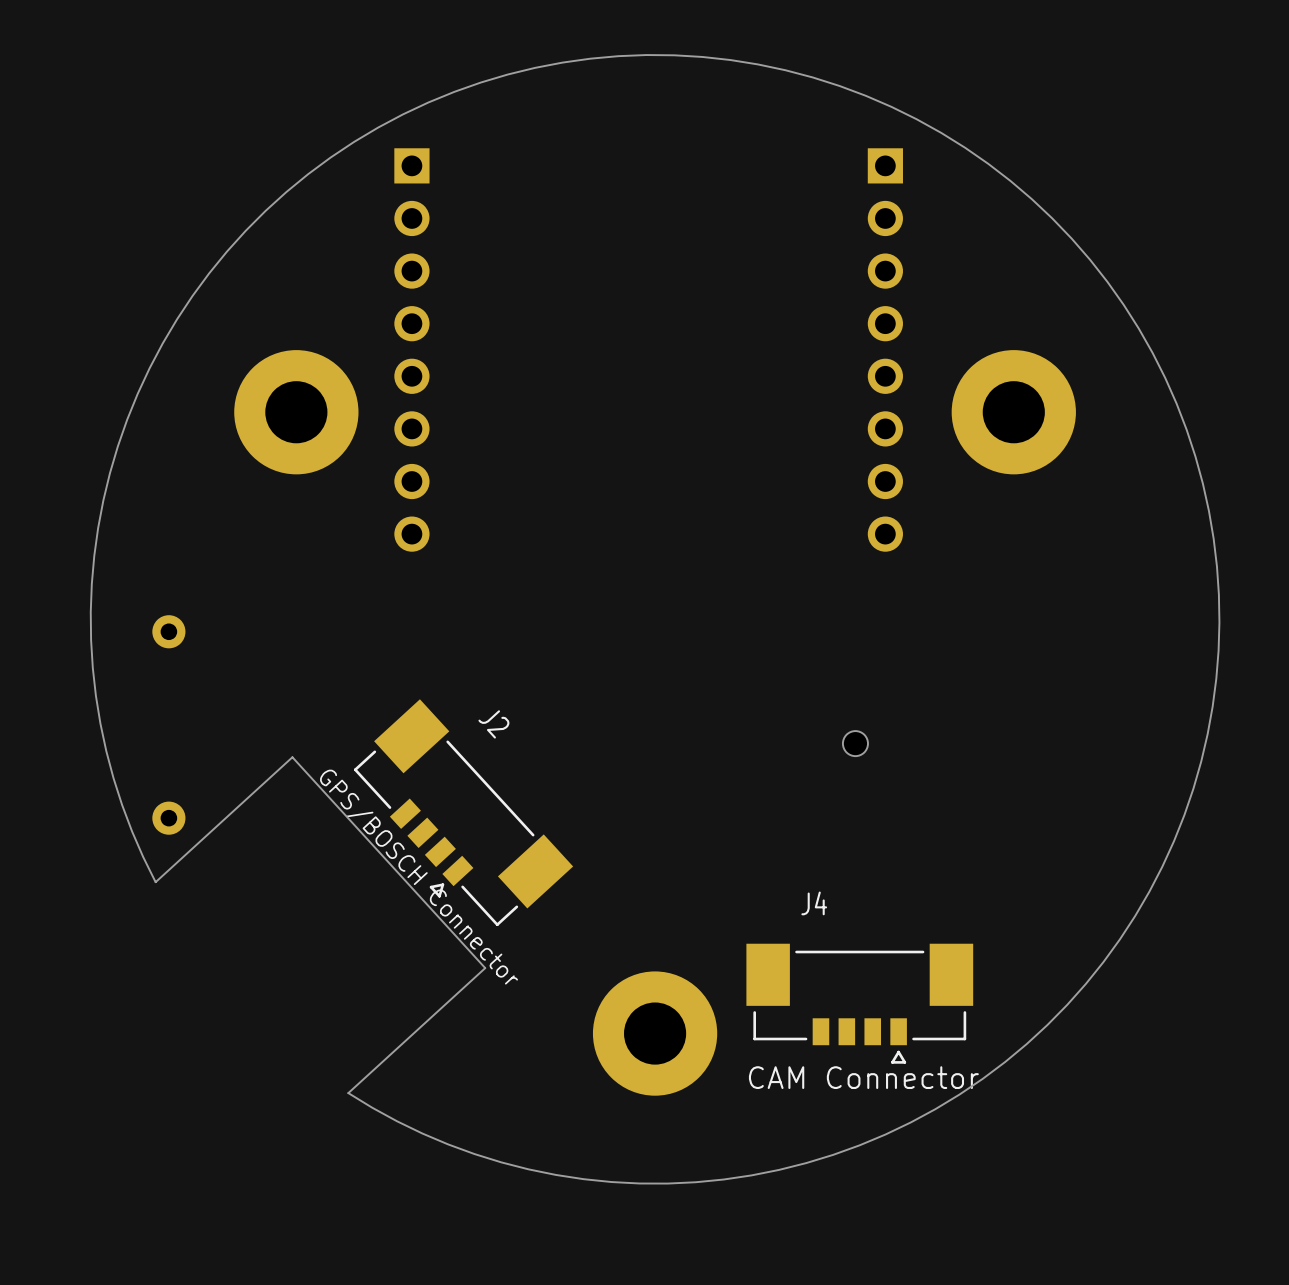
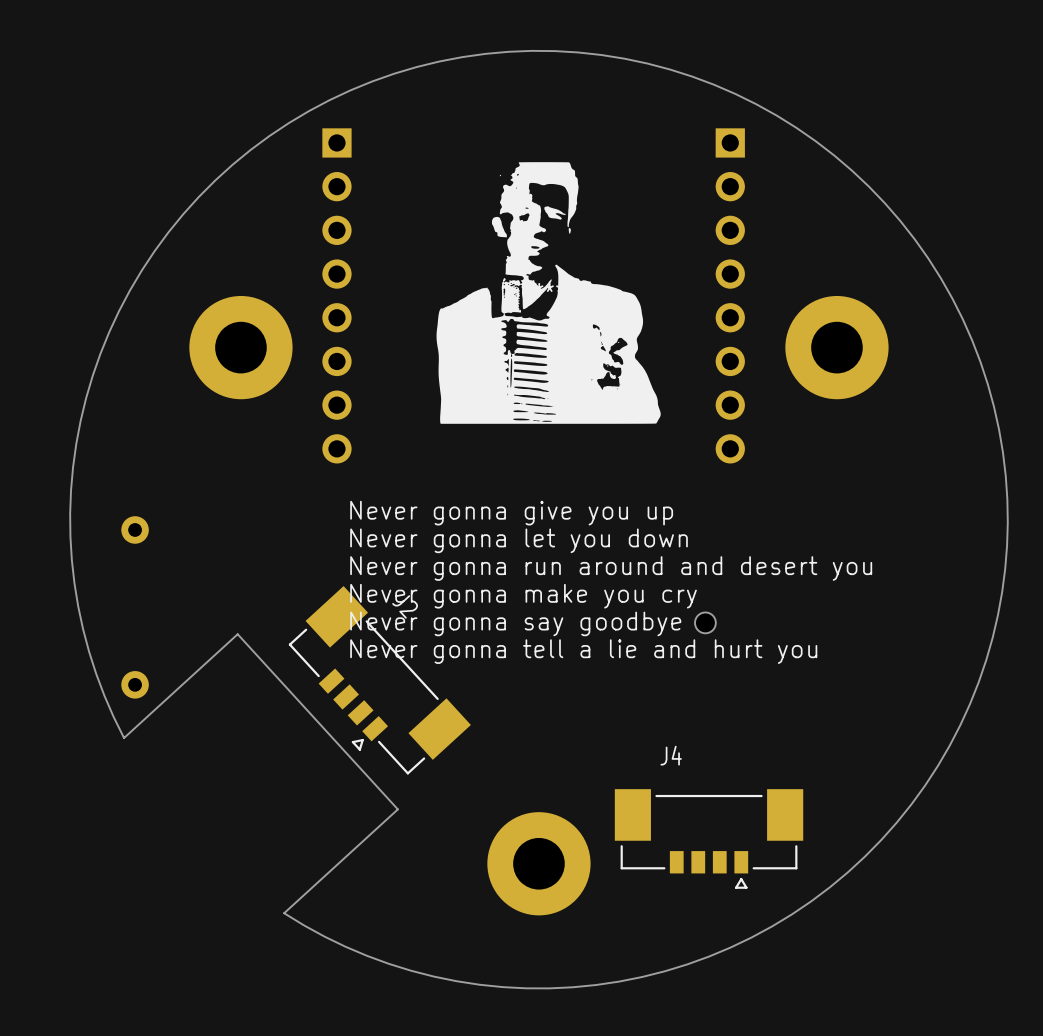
part: none -> (548, 292)
text: none -> Never gonna give you up (511, 513)
text: none -> Never gonna let you down (519, 540)
text: none -> Never gonna run around and desert you (611, 568)
text: none -> Never gonna make you cry (523, 596)
text: none -> Never gonna say goodbye (515, 623)
text: none -> Never gonna tell a lie and hurt you (583, 651)
text: GPS/BOSCH Connector (419, 877) -> none
text: CAM Connector (863, 1077) -> none

